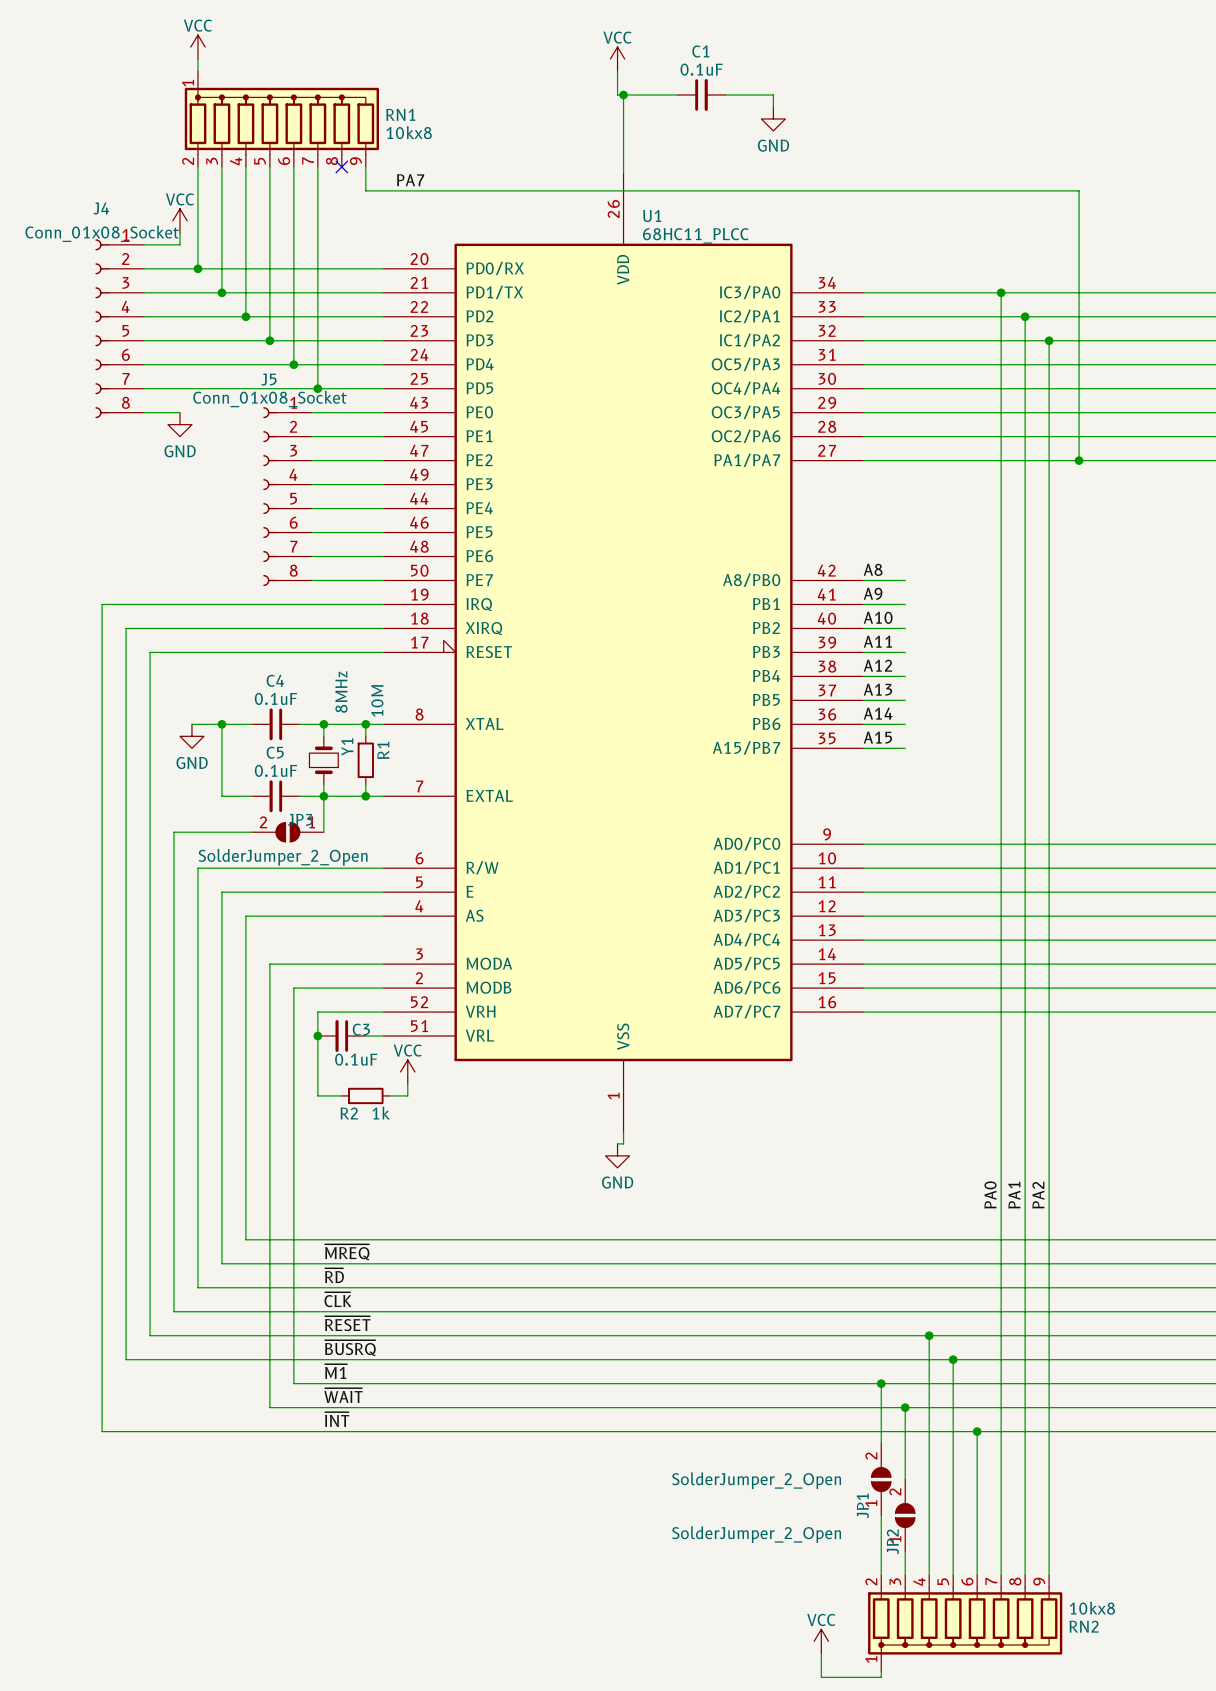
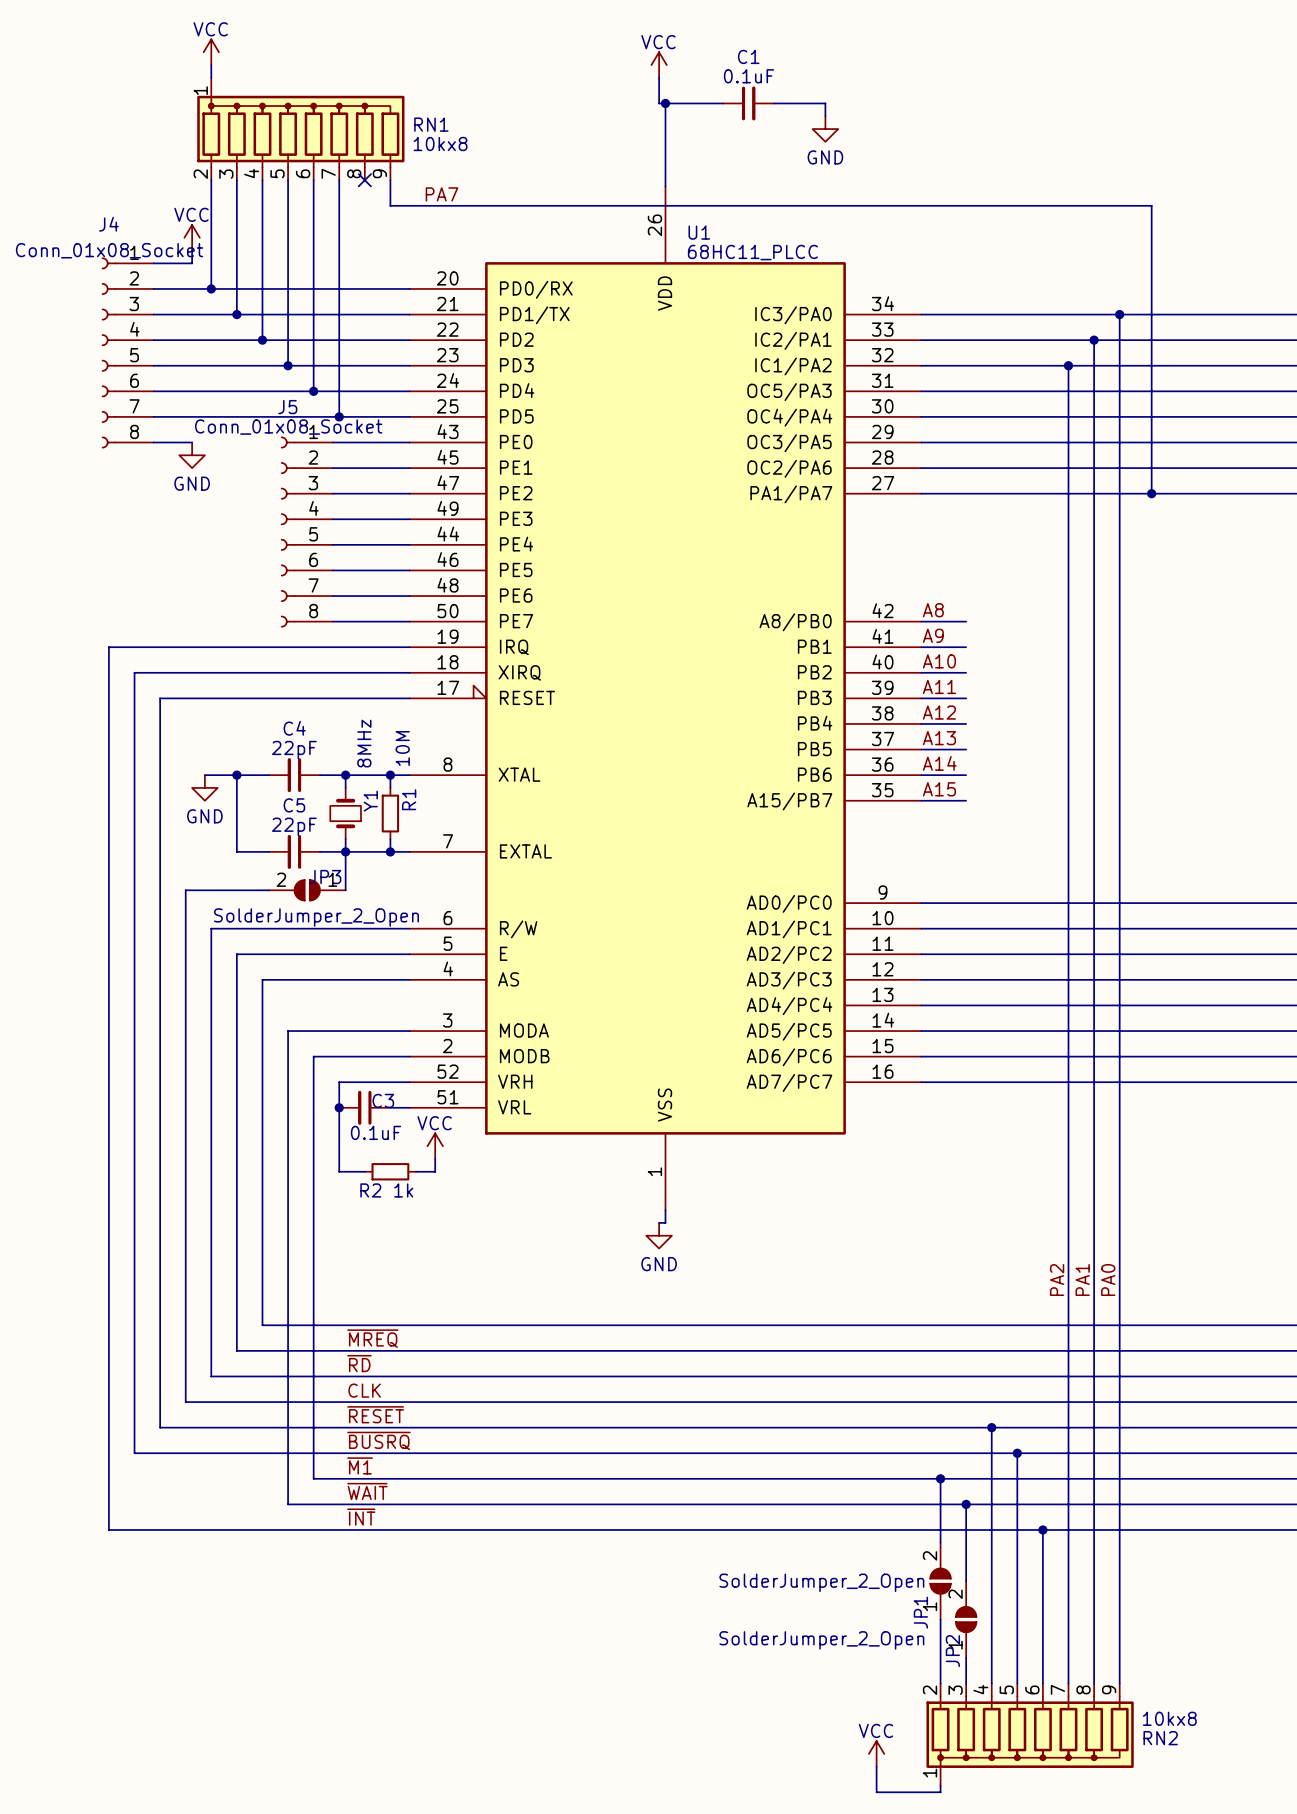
wire: (1001, 292) (1001, 340) -> (1119, 314) (1119, 365)
junction: (1001, 292) -> none
junction: none -> (1119, 314)
junction: none -> (1068, 365)
junction: (1049, 340) -> none
C4 value: 0.1uF (275, 698) -> 22pF (294, 750)
C5 value: 0.1uF (275, 770) -> 22pF (294, 826)
label: PA0 (990, 1194) -> PA2 (1057, 1280)
label: PA2 (1038, 1195) -> PA0 (1108, 1280)
label: ~{CLK} (337, 1299) -> CLK (364, 1390)

